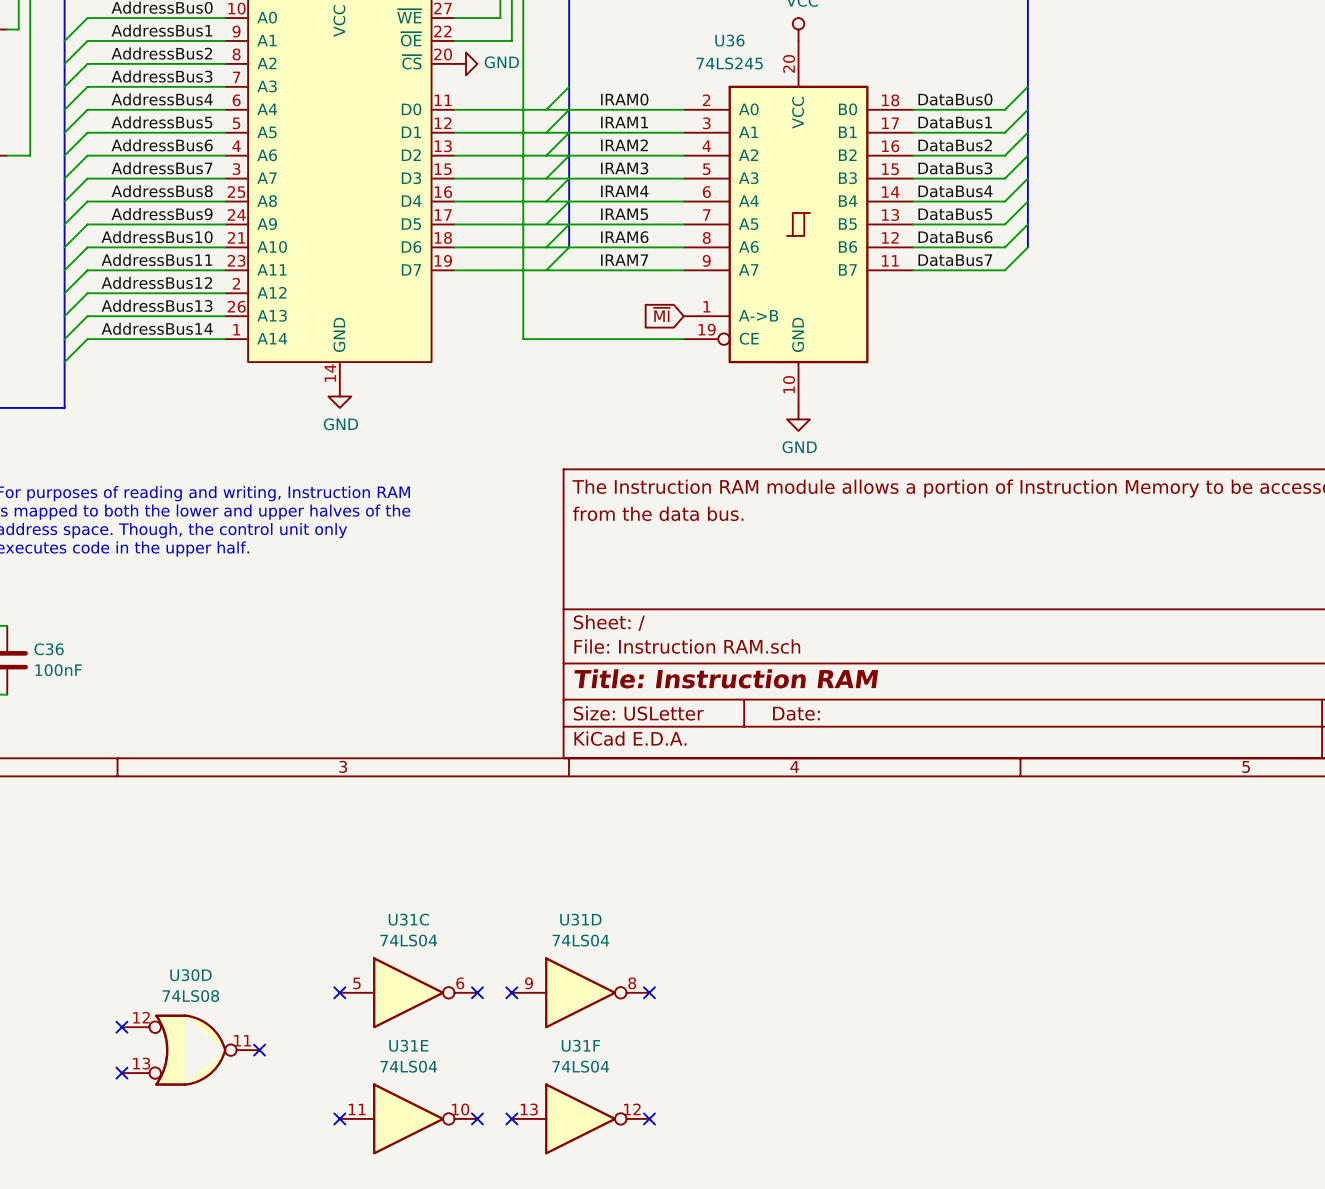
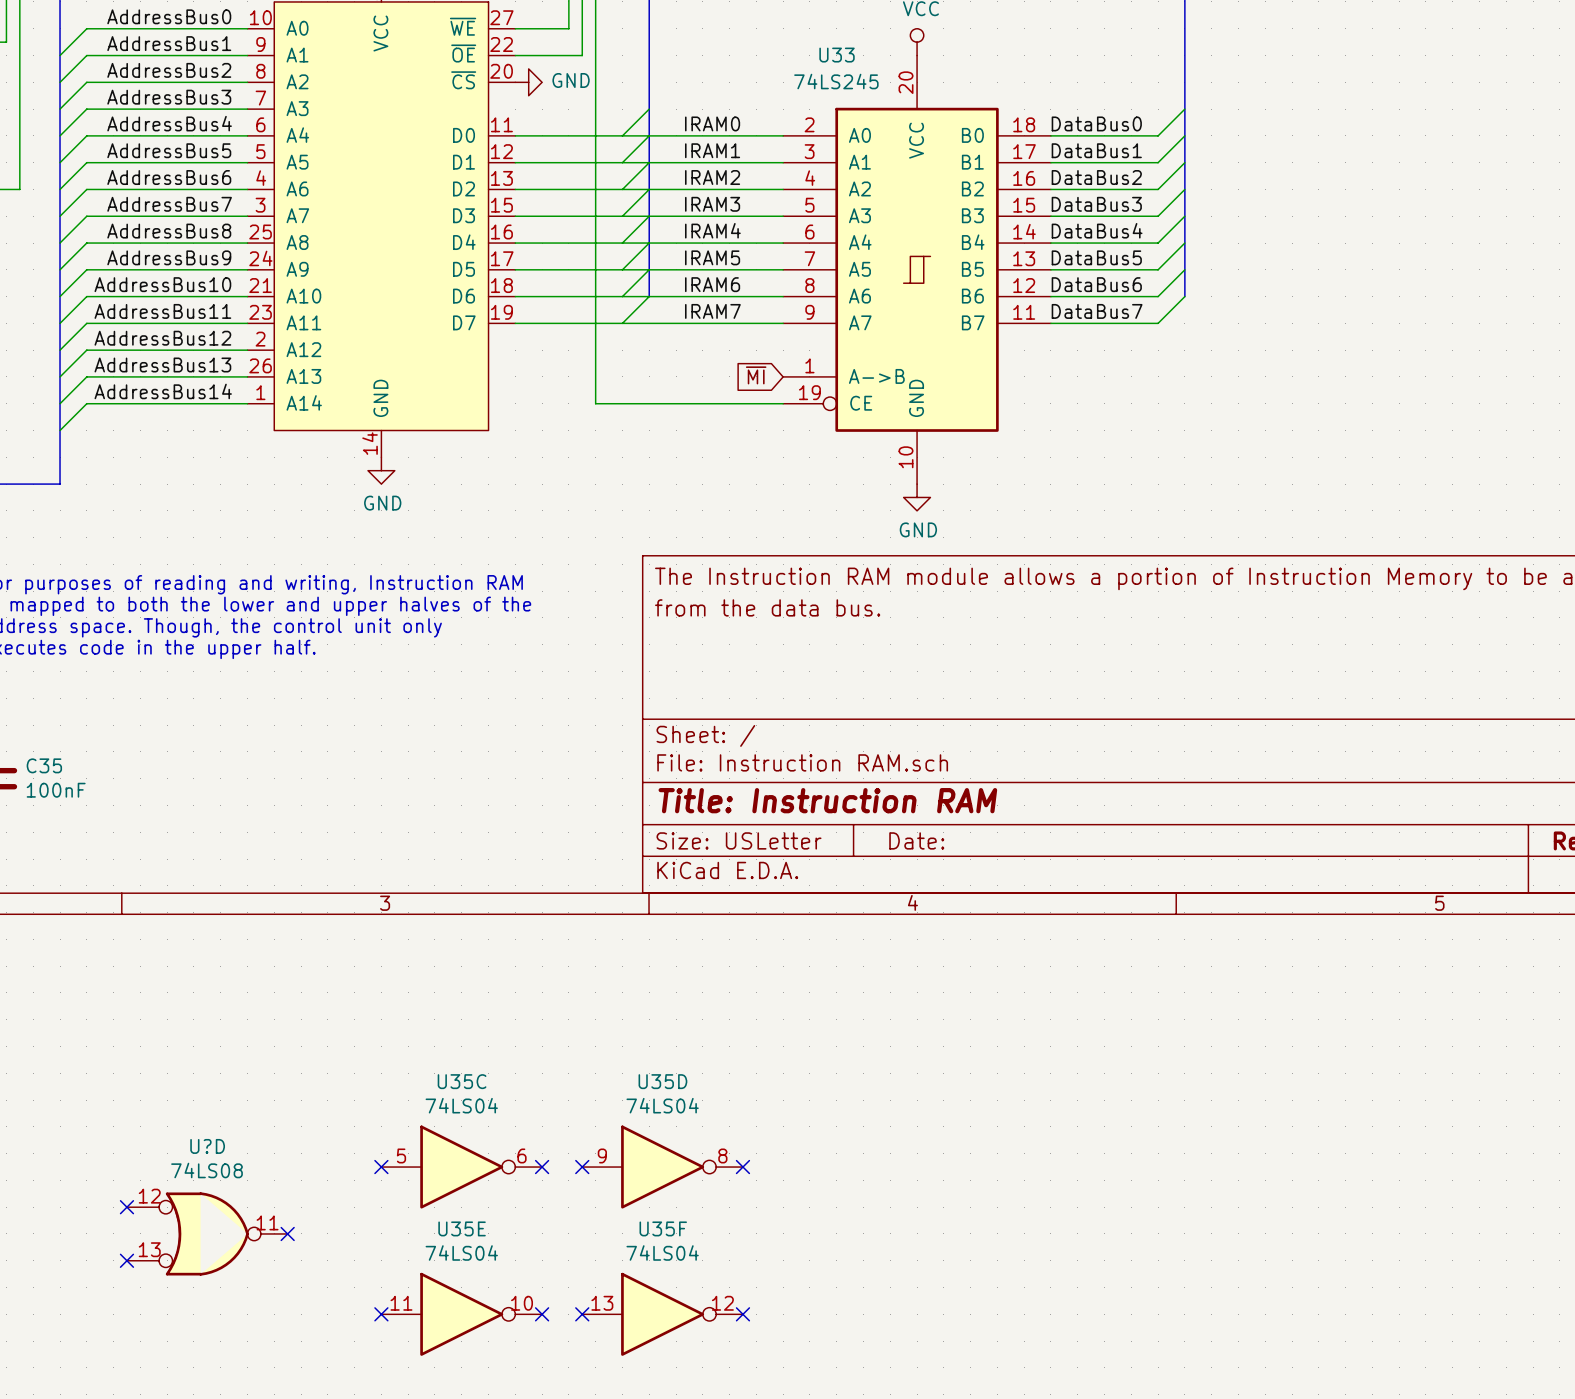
U36 name: U36 (729, 40) -> U33 (837, 55)
C36 name: C36 (49, 649) -> C35 (44, 765)
U31C name: U31C (408, 919) -> U35C (462, 1081)
U31D name: U31D (580, 919) -> U35D (662, 1081)
U30D name: U30D (190, 975) -> U?D (207, 1146)
U31E name: U31E (408, 1045) -> U35E (462, 1228)
U31F name: U31F (580, 1045) -> U35F (663, 1228)

